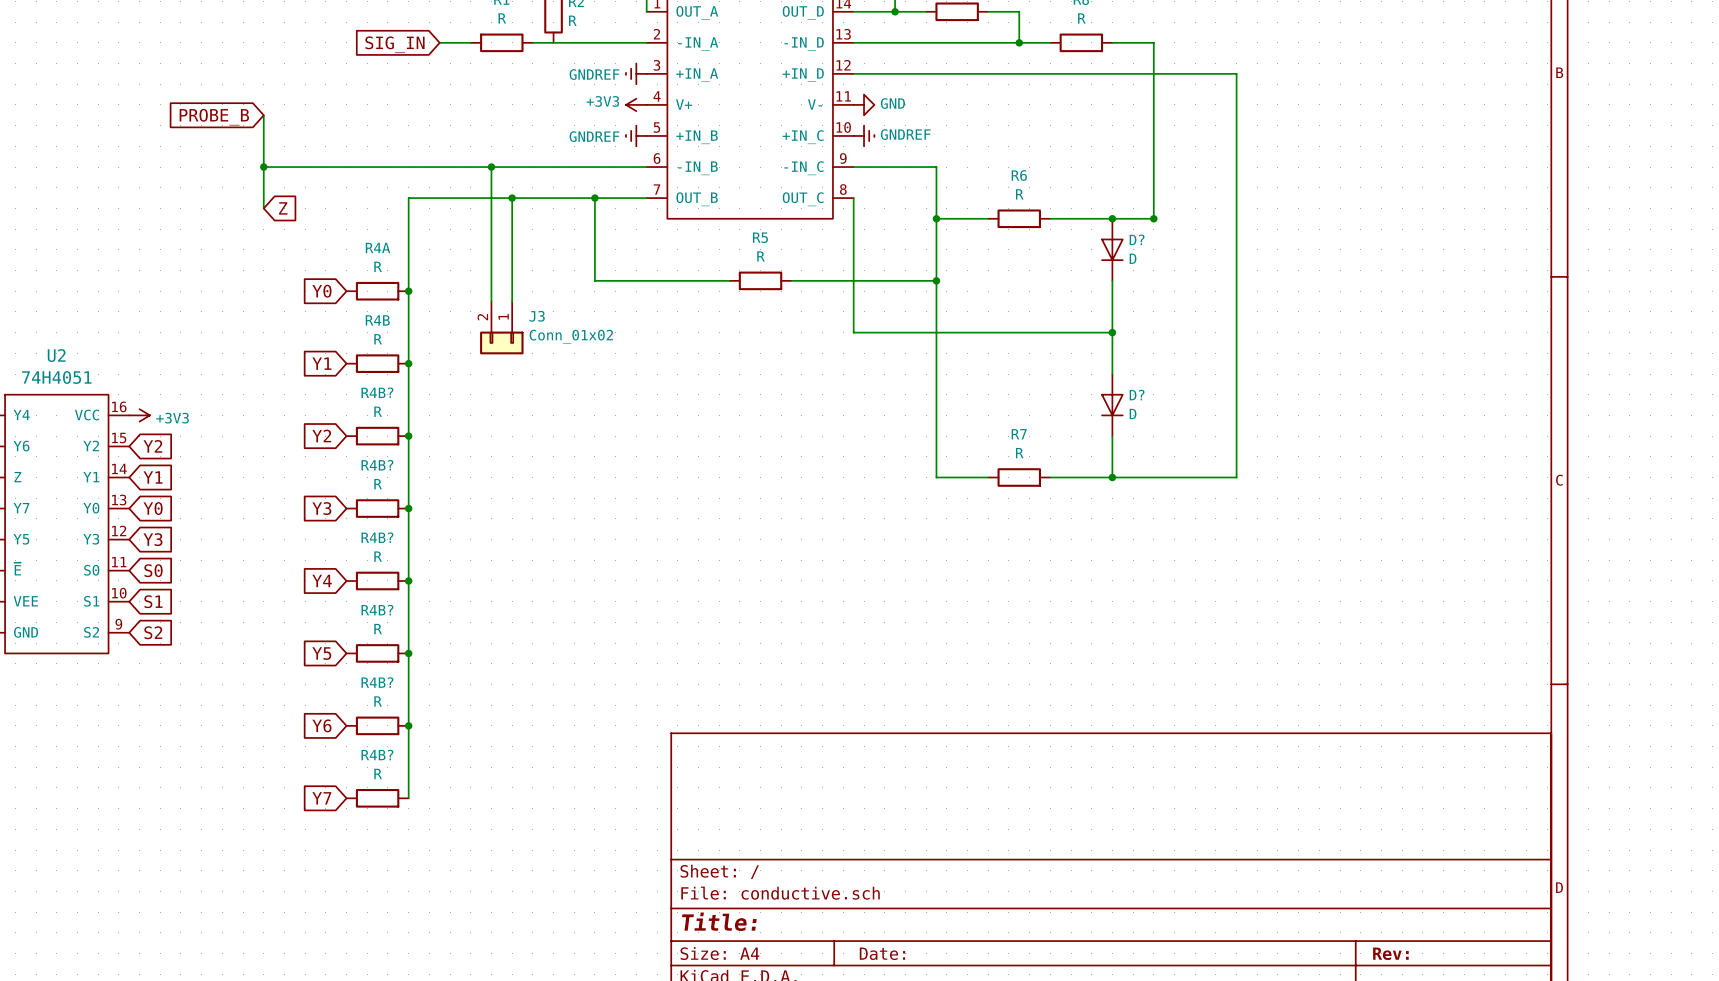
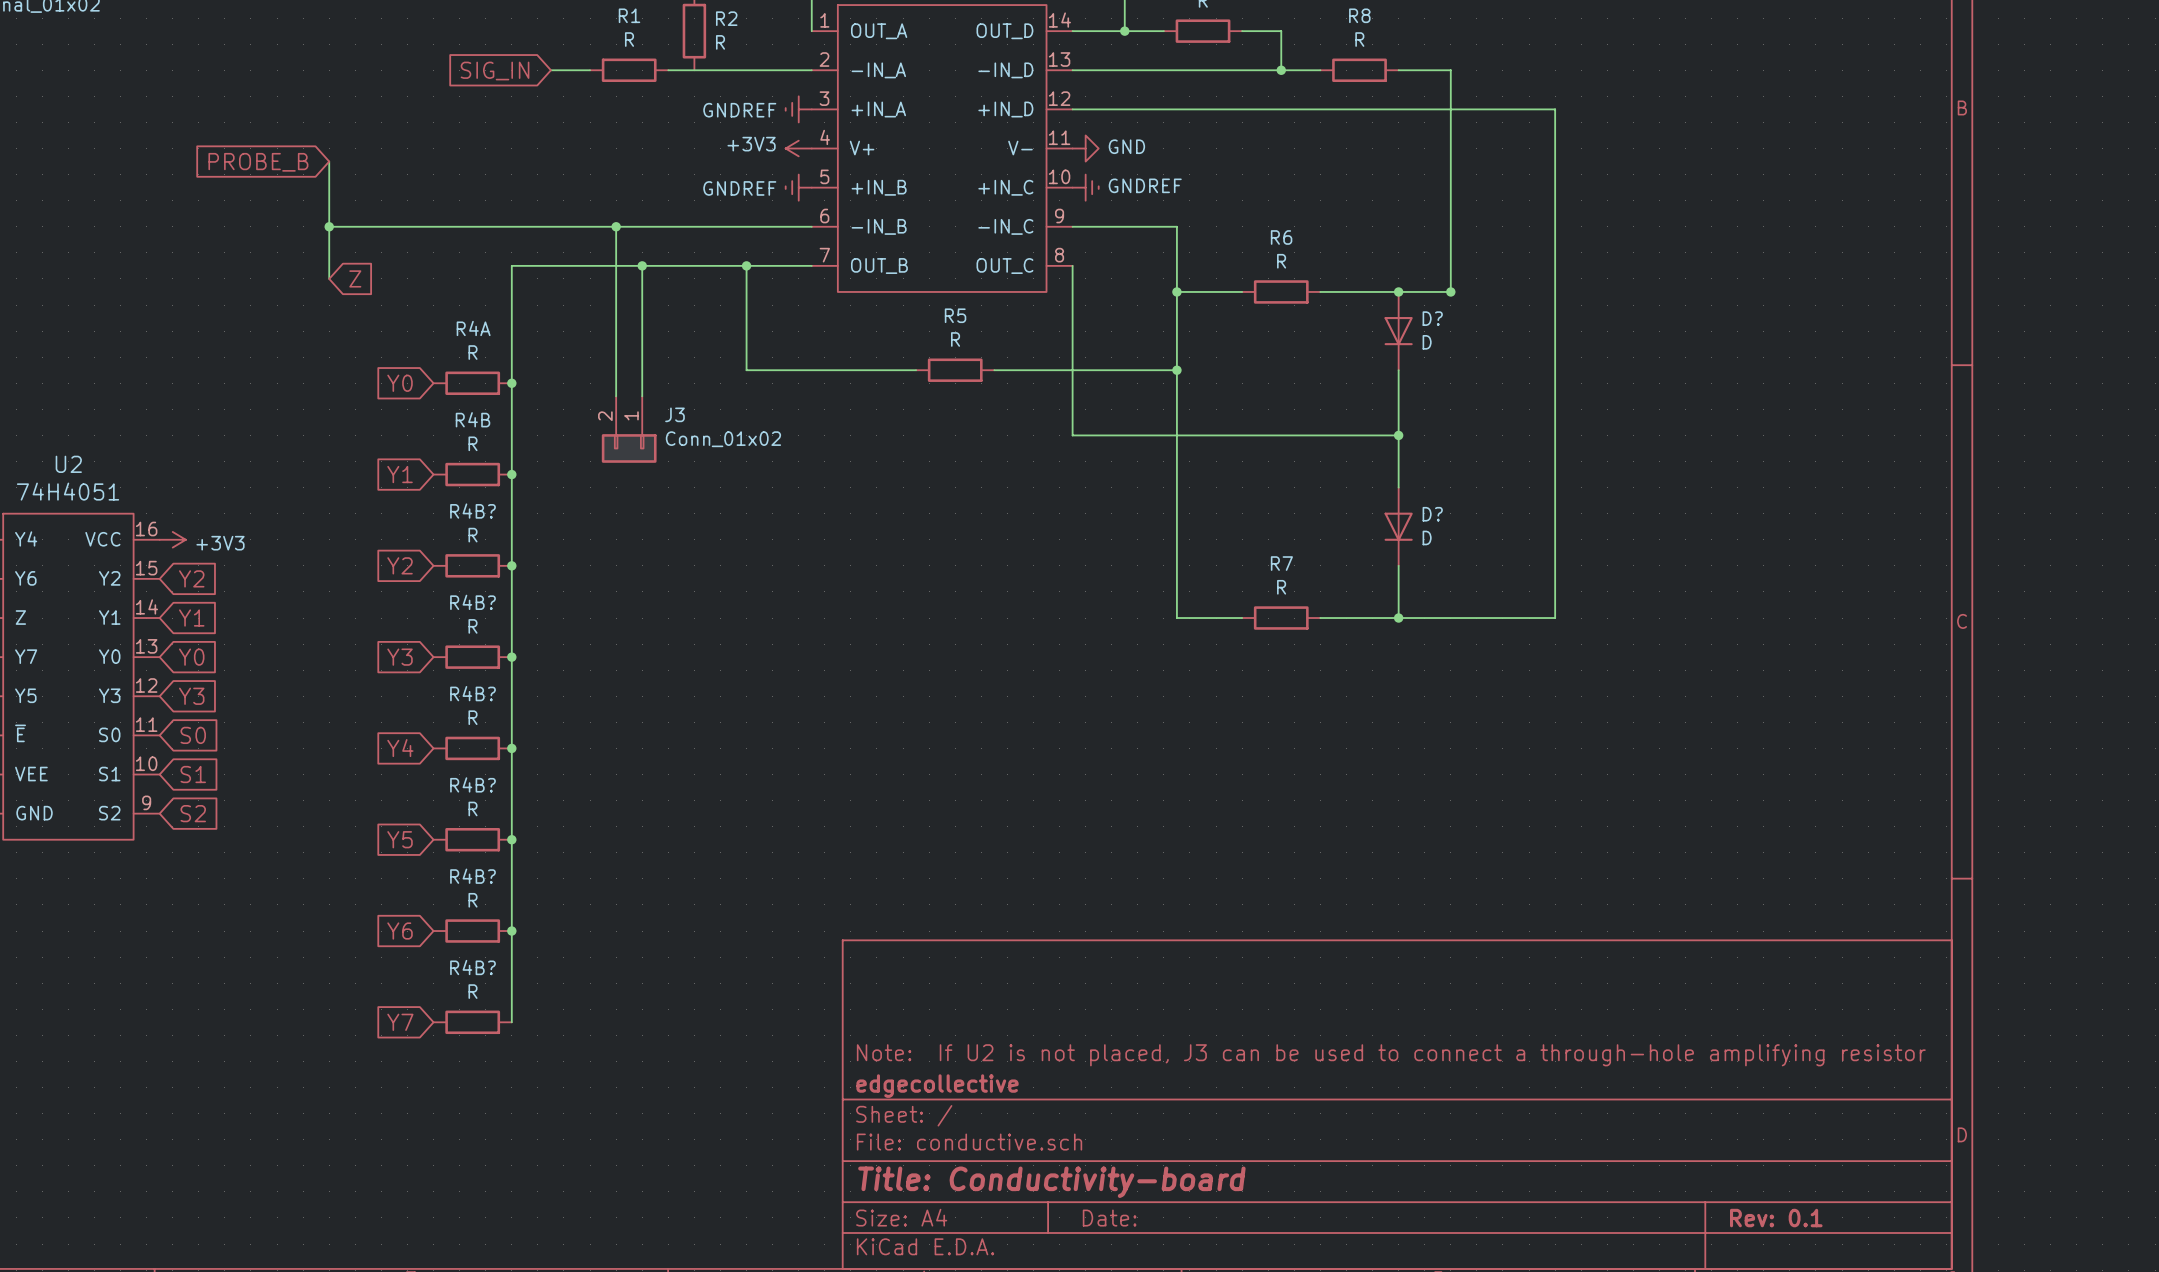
title block: none -> Note: If U2 is not placed, J3 can be used to connect a through-hole amplifying resistor (1391, 1055)
title block: none -> edgecollective (937, 1086)
title block: Title: (719, 921) -> Title: Conductivity-board (1051, 1182)
title block: Rev: (1390, 953) -> Rev: 0.1 (1776, 1218)

